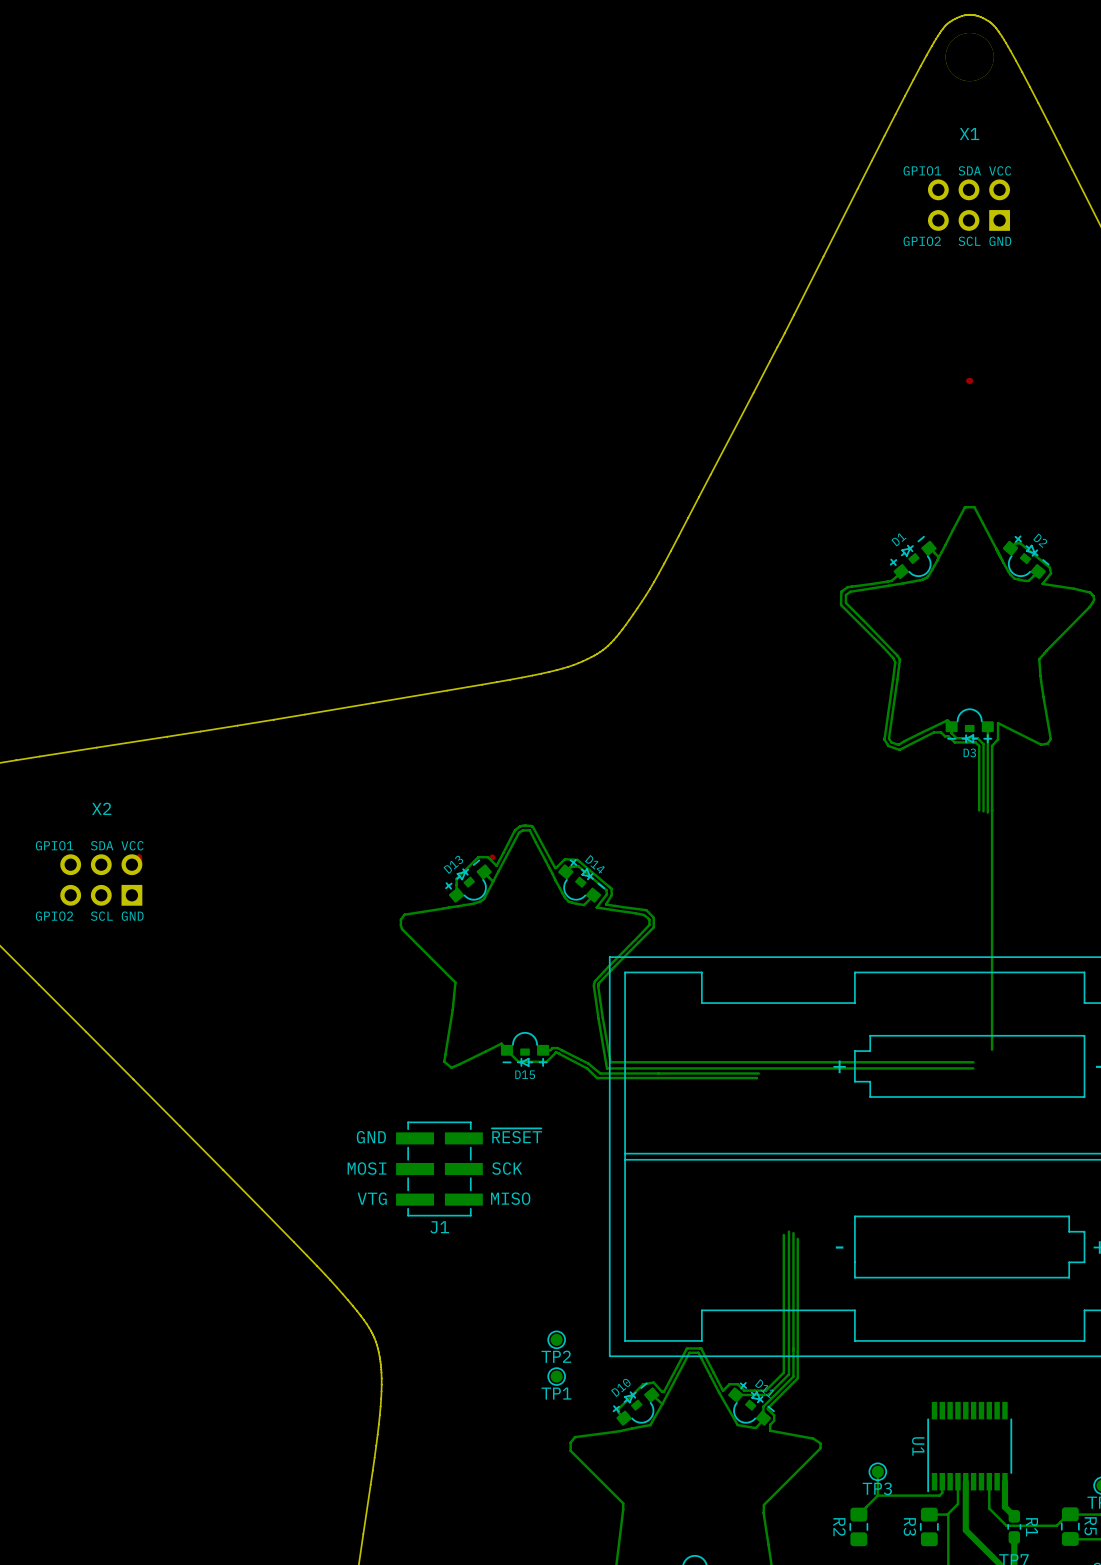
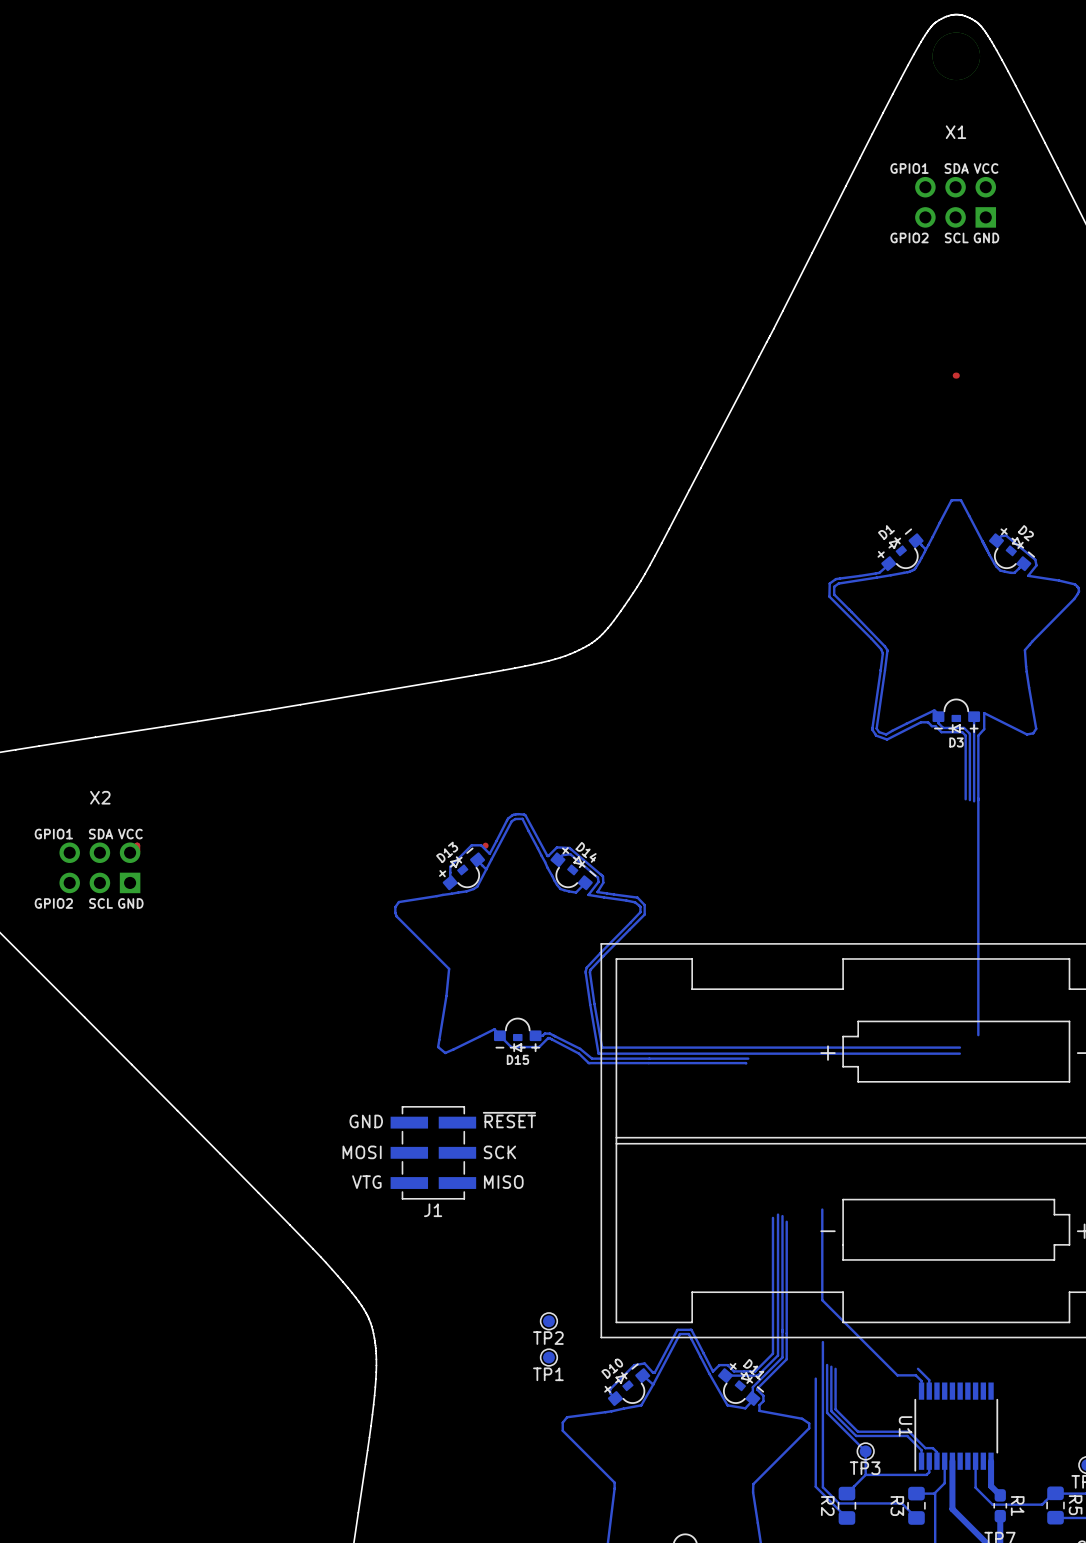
bottom track: none -> (822, 1209) (822, 1300) (897, 1375) (915, 1375) (921, 1381) (921, 1391)
bottom track: none -> (822, 1342) (822, 1487) (839, 1503) (901, 1503) (916, 1517)
bottom track: none -> (827, 1364) (827, 1412) (865, 1451)
bottom track: none -> (831, 1366) (831, 1411) (856, 1435) (907, 1435) (921, 1450) (921, 1461)
bottom track: none -> (835, 1368) (835, 1409) (857, 1431) (909, 1431) (925, 1448) (932, 1448) (936, 1452) (936, 1461)
bottom track: none -> (918, 1368) (929, 1380) (929, 1391)
bottom track: none -> (815, 1378) (815, 1486) (846, 1517)

